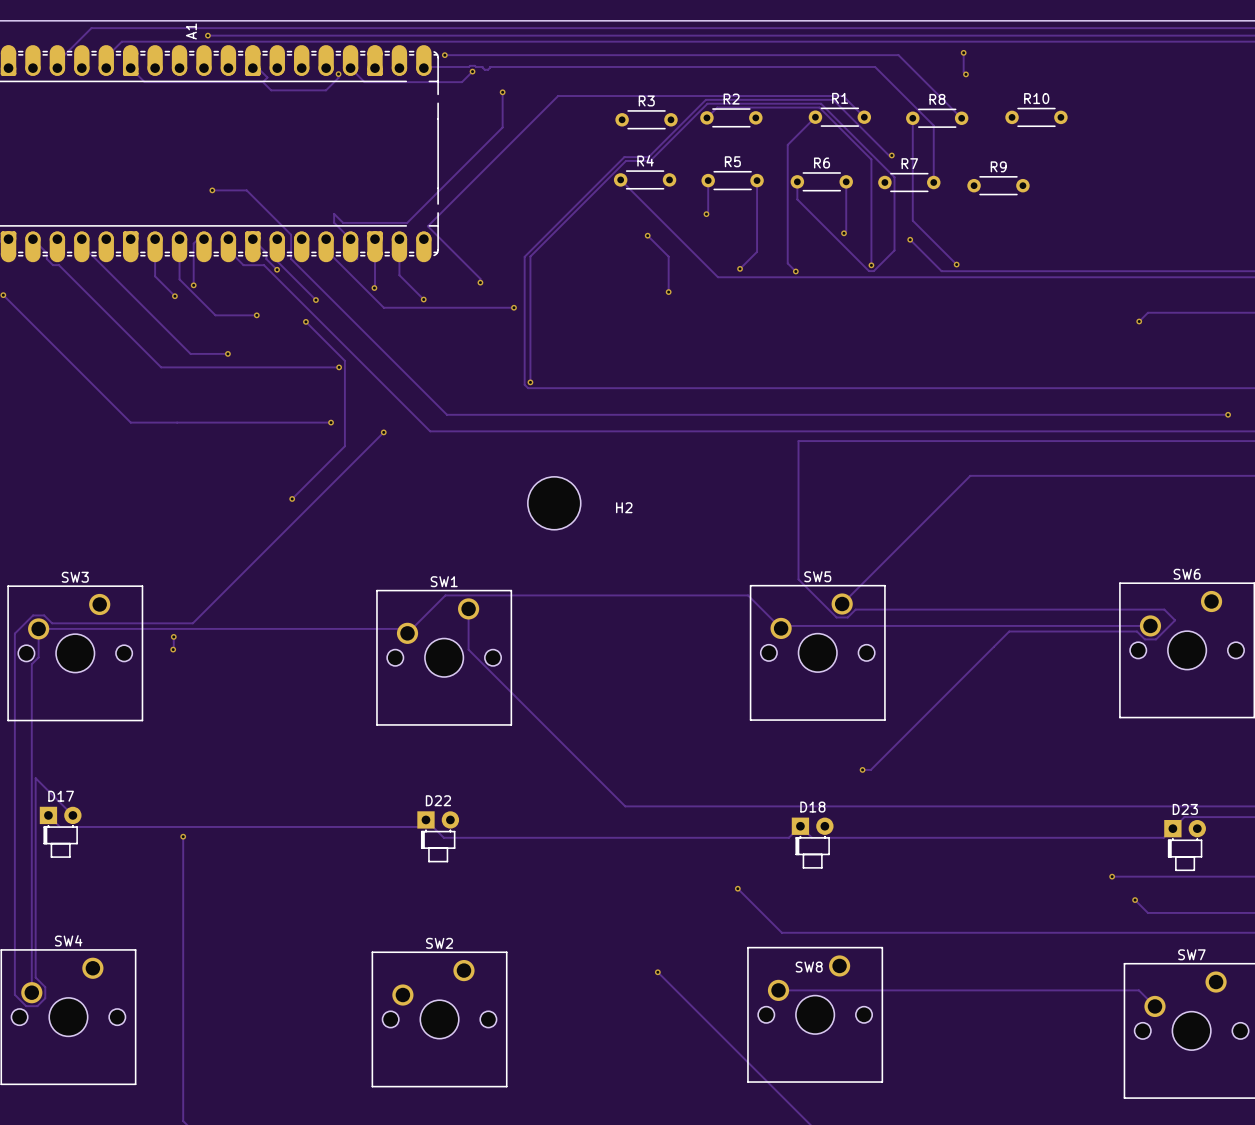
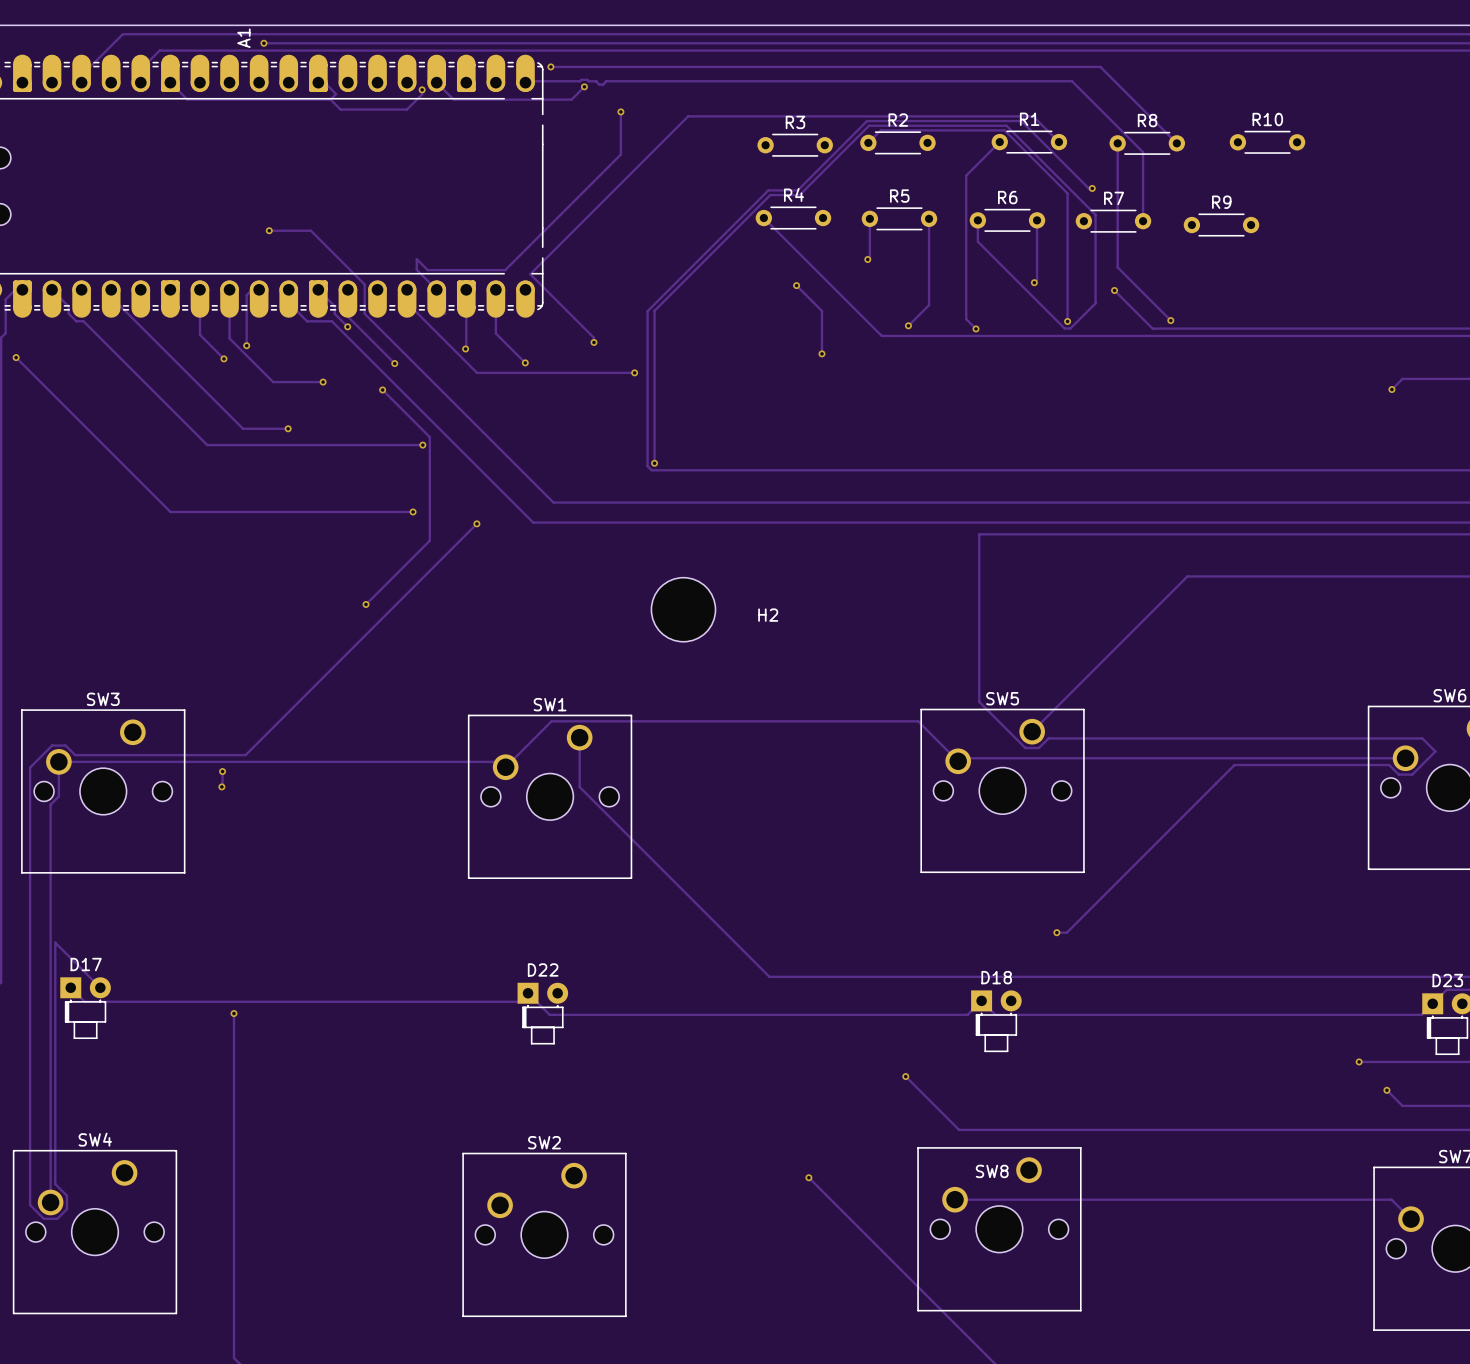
track: (963, 52) (963, 72) (965, 74) -> none
via: (963, 52) -> none
via: (965, 74) -> none

